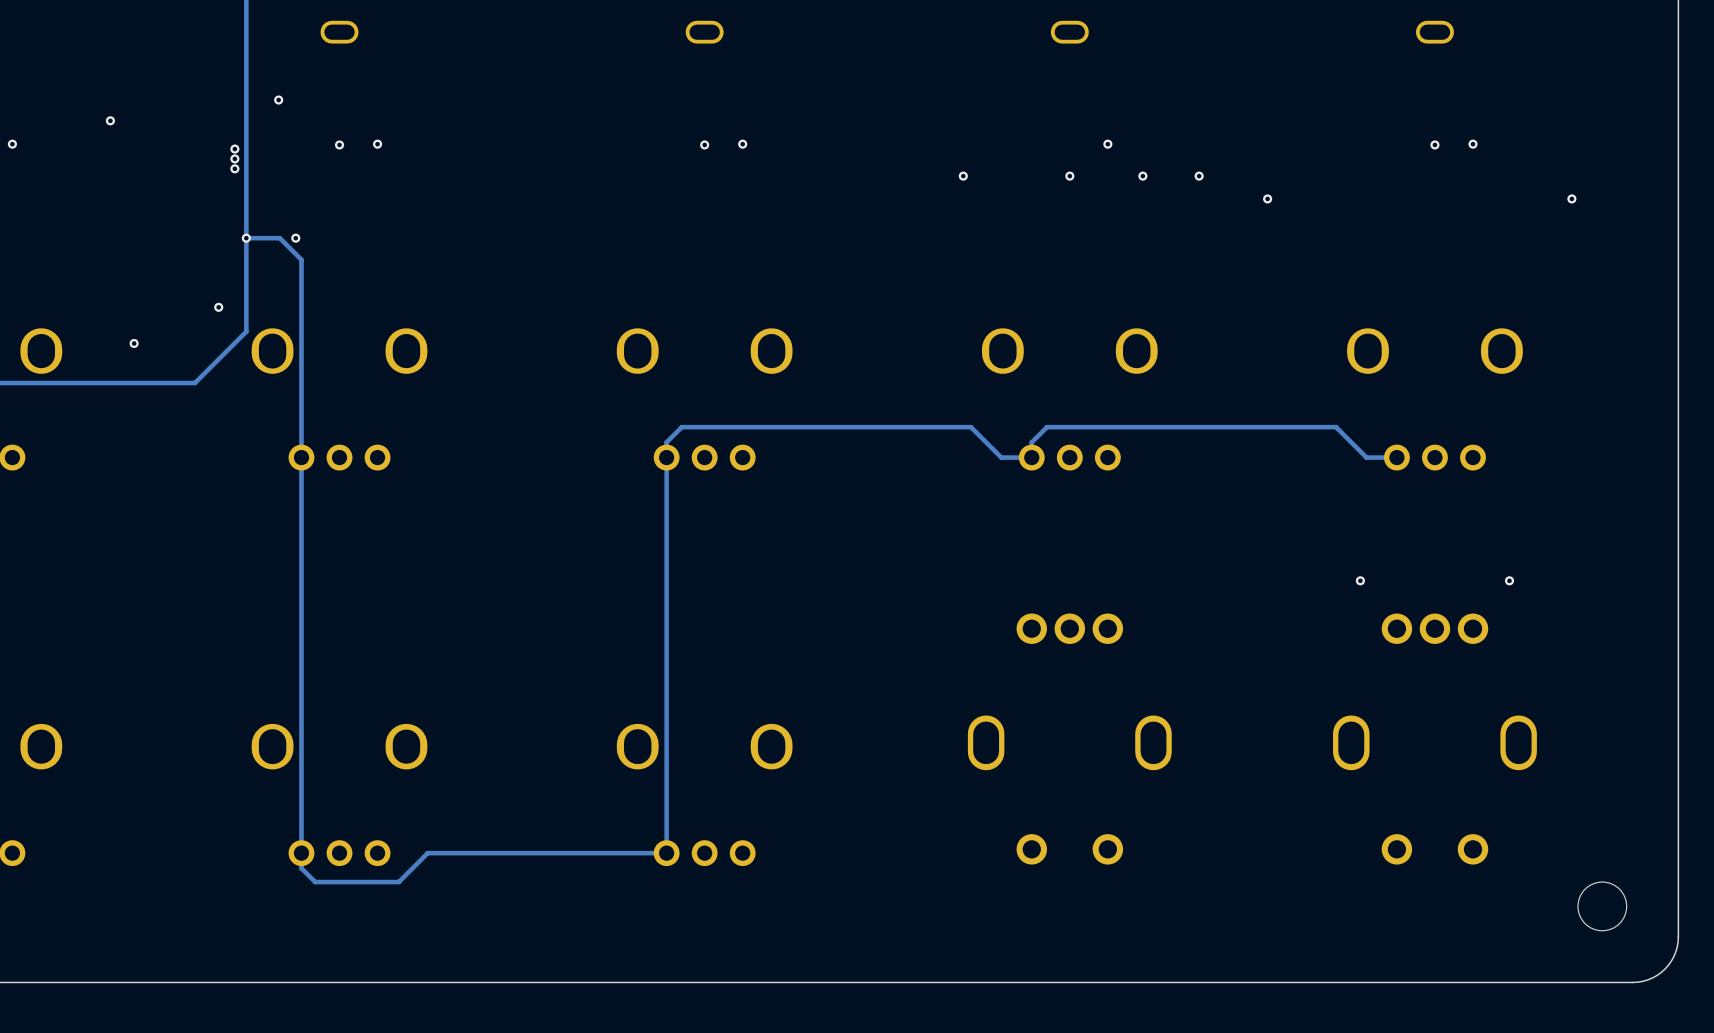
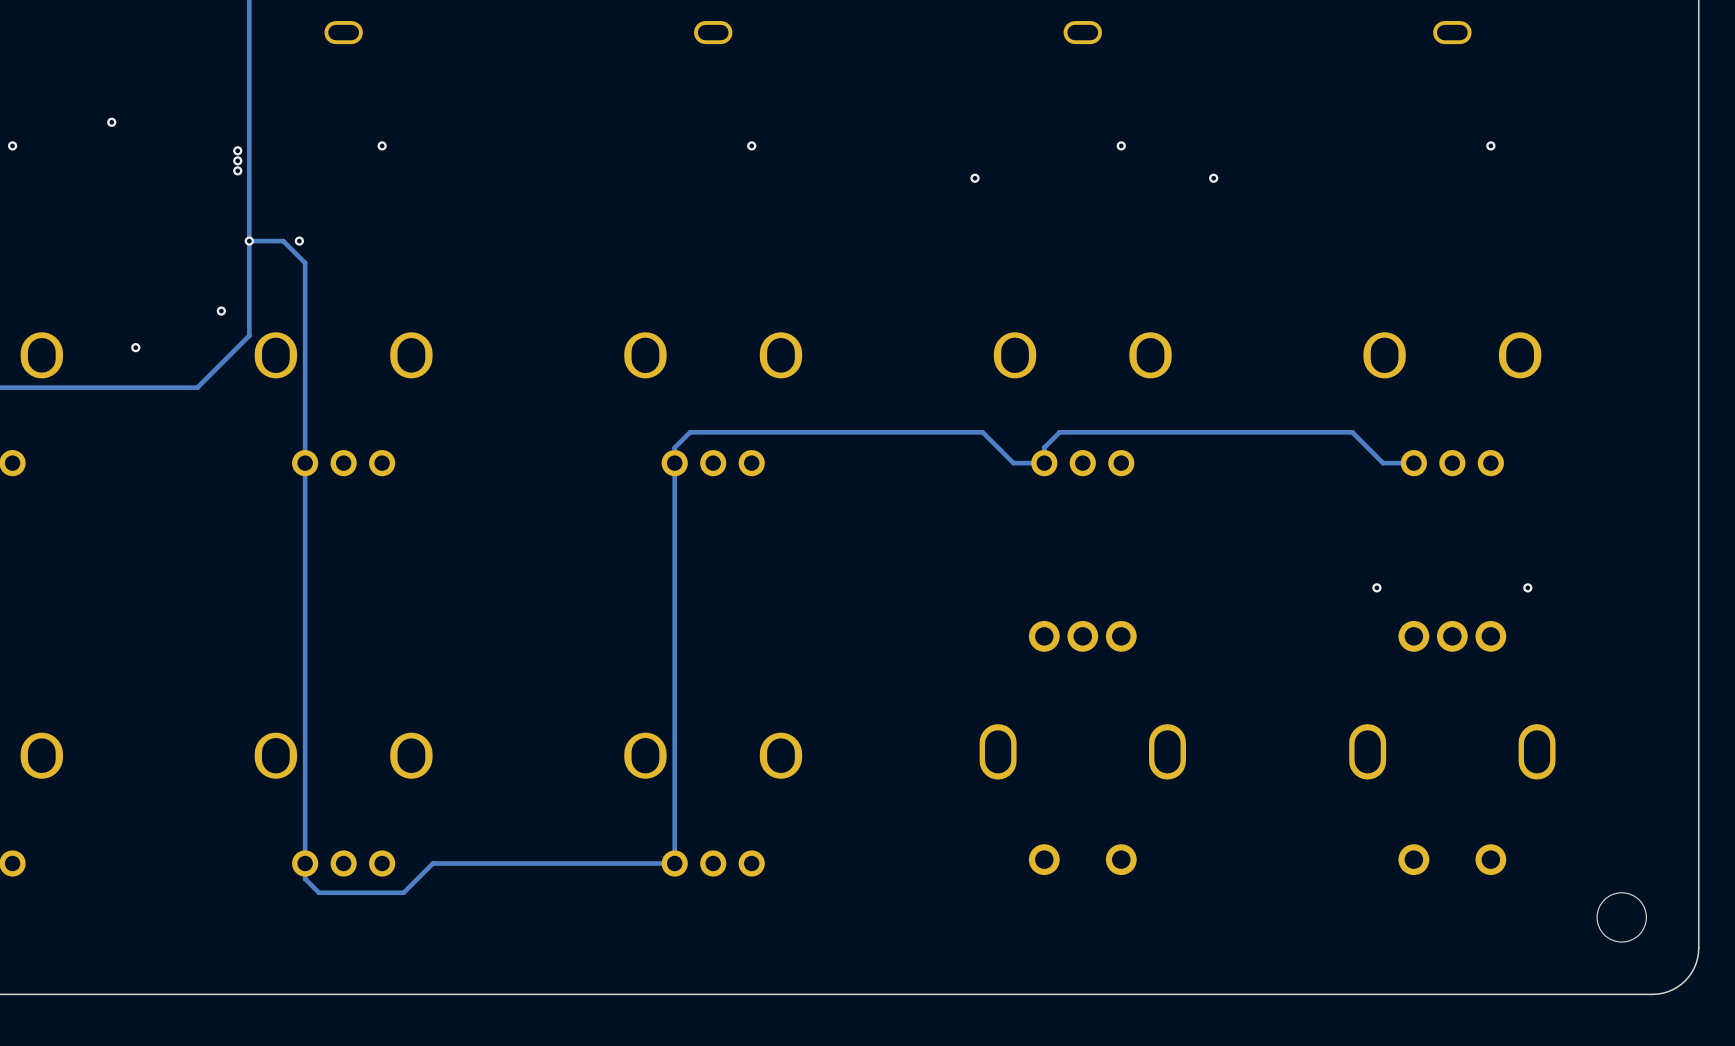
via: (278, 100) -> none
via: (339, 144) -> none
via: (704, 144) -> none
via: (1434, 144) -> none
via: (1069, 176) -> none
via: (1142, 176) -> none
via: (1267, 198) -> none
via: (1571, 198) -> none

